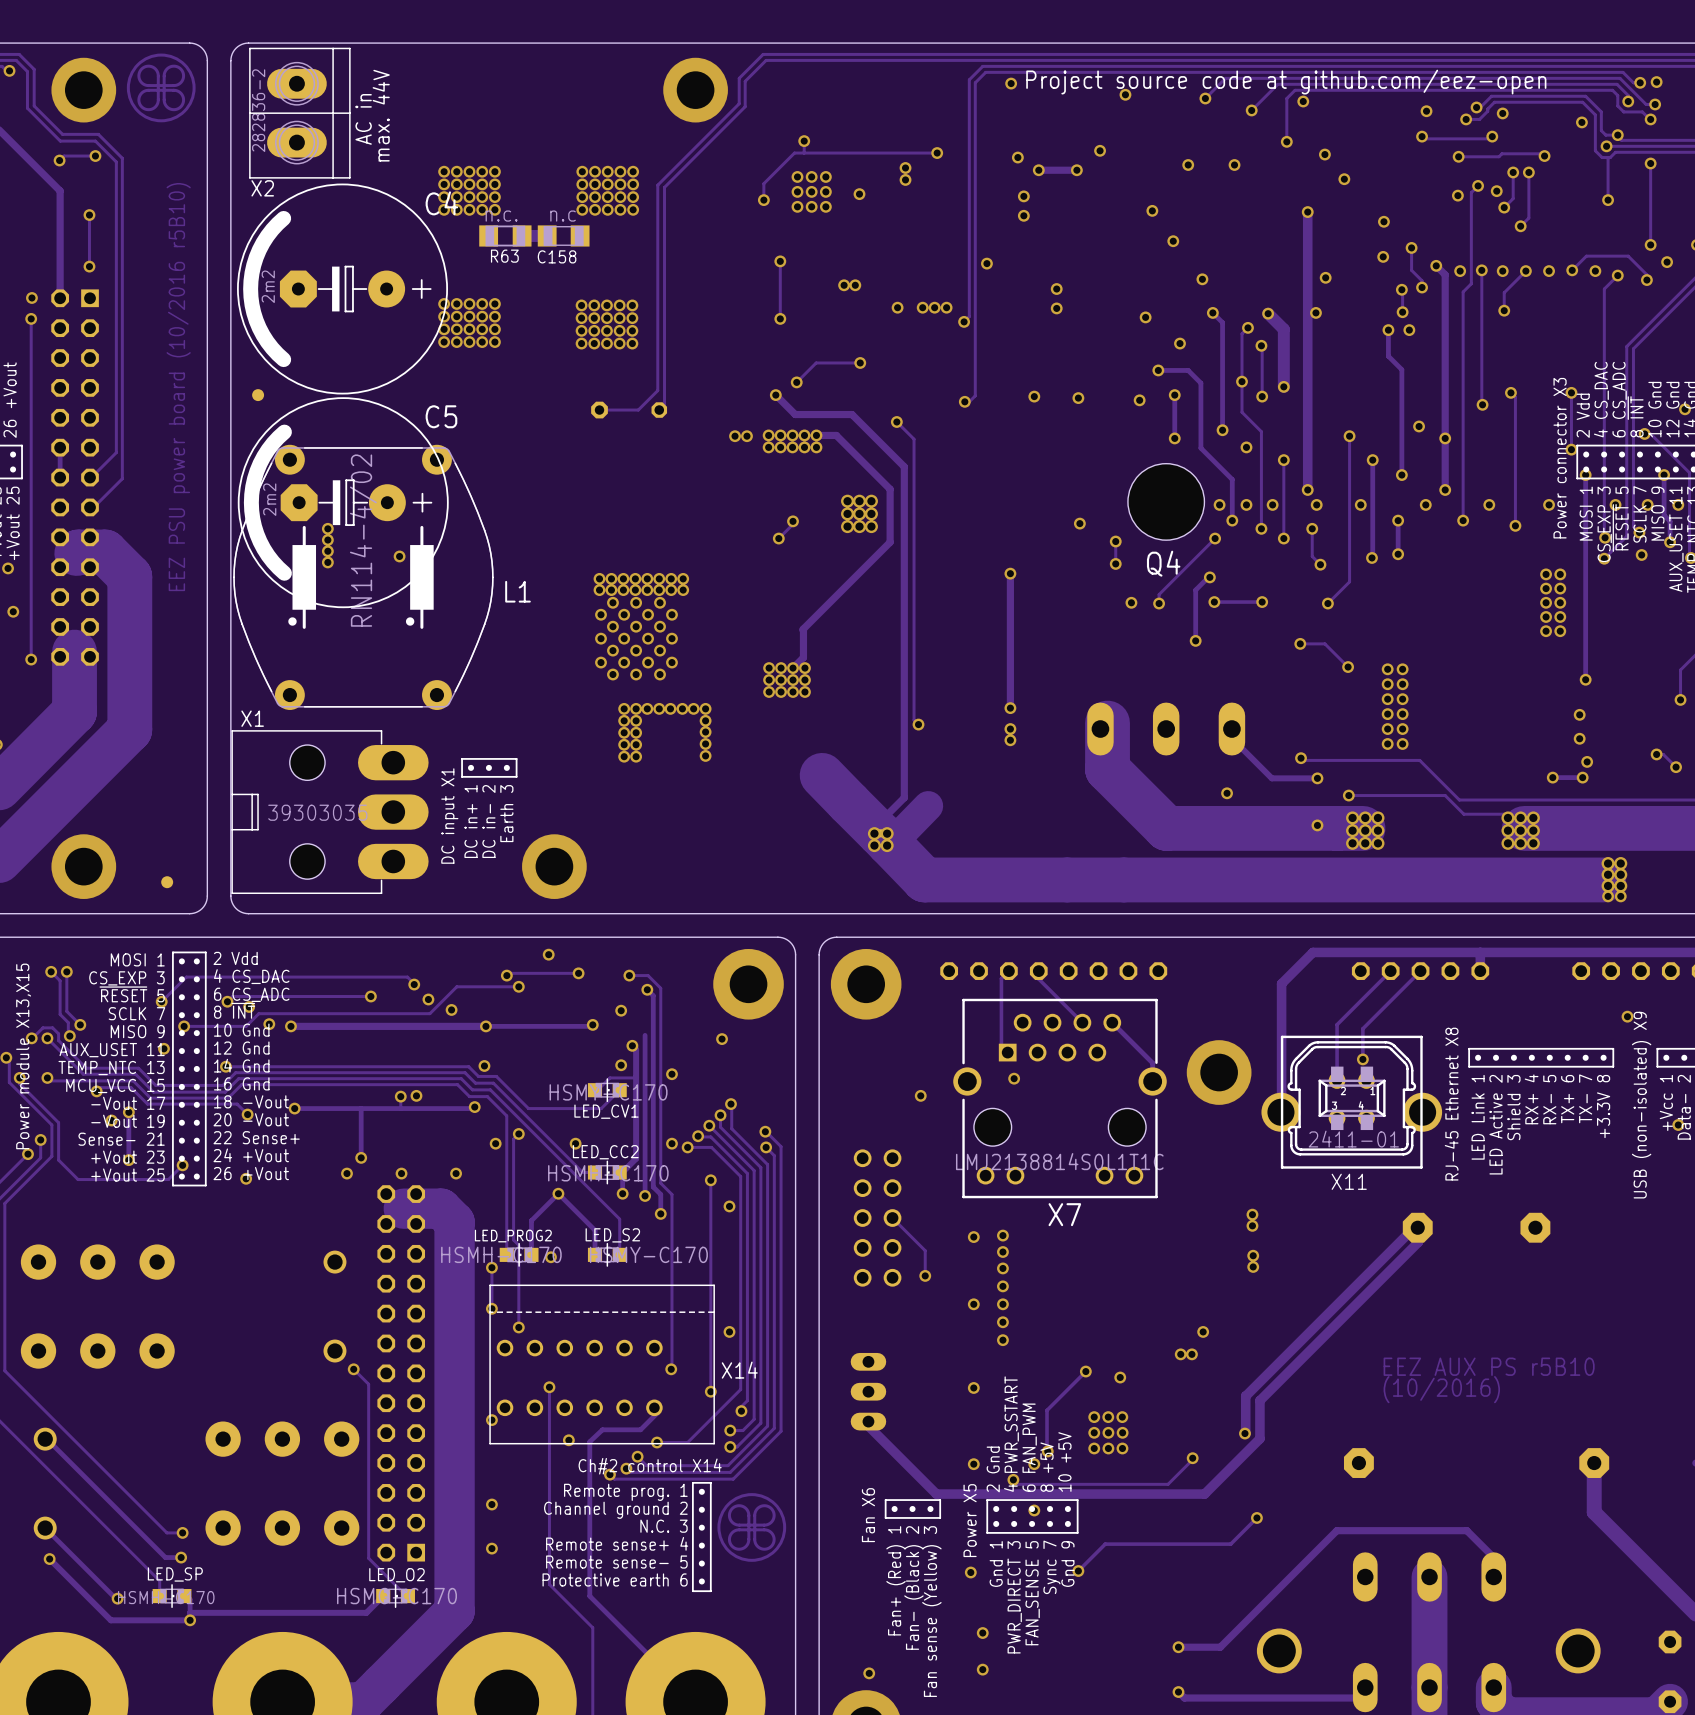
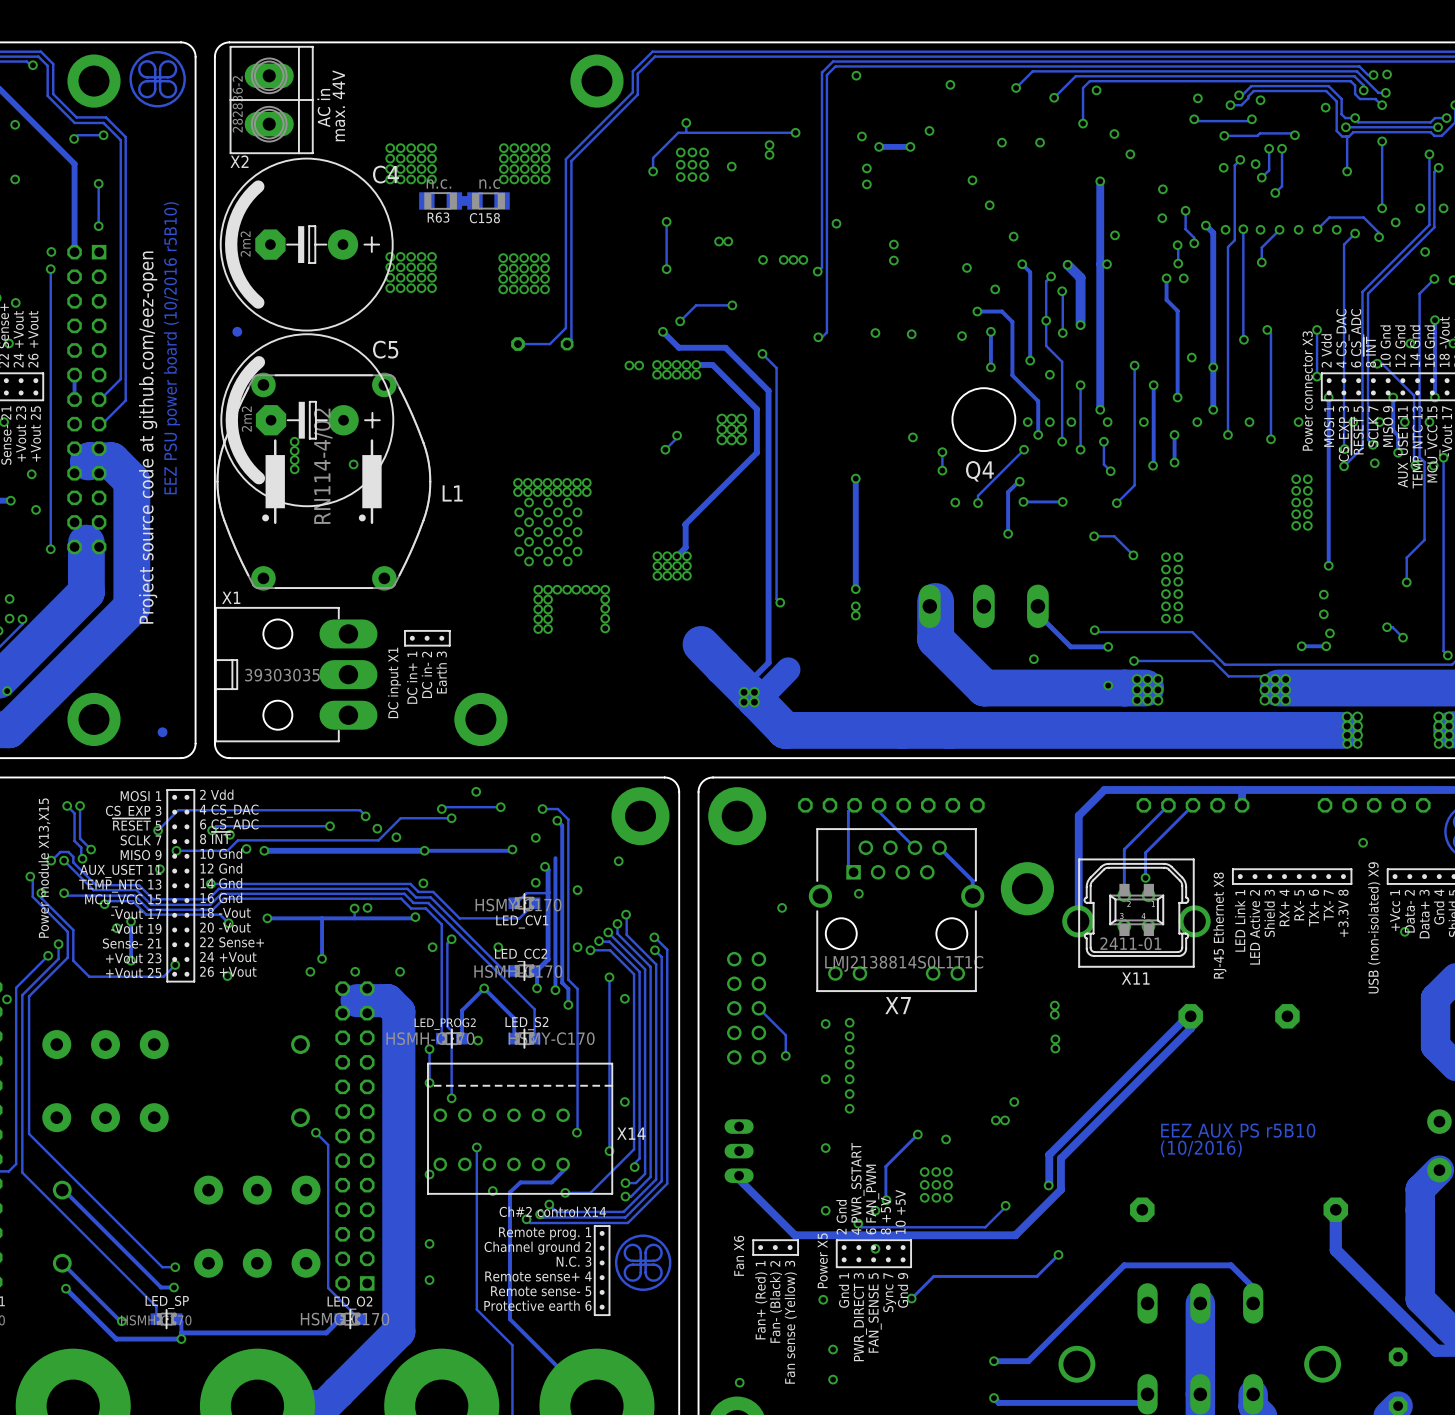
text: Project source code at github.com/eez-open (1286, 82) -> none
text: none -> Project source code at github.com/eez-open (148, 437)

